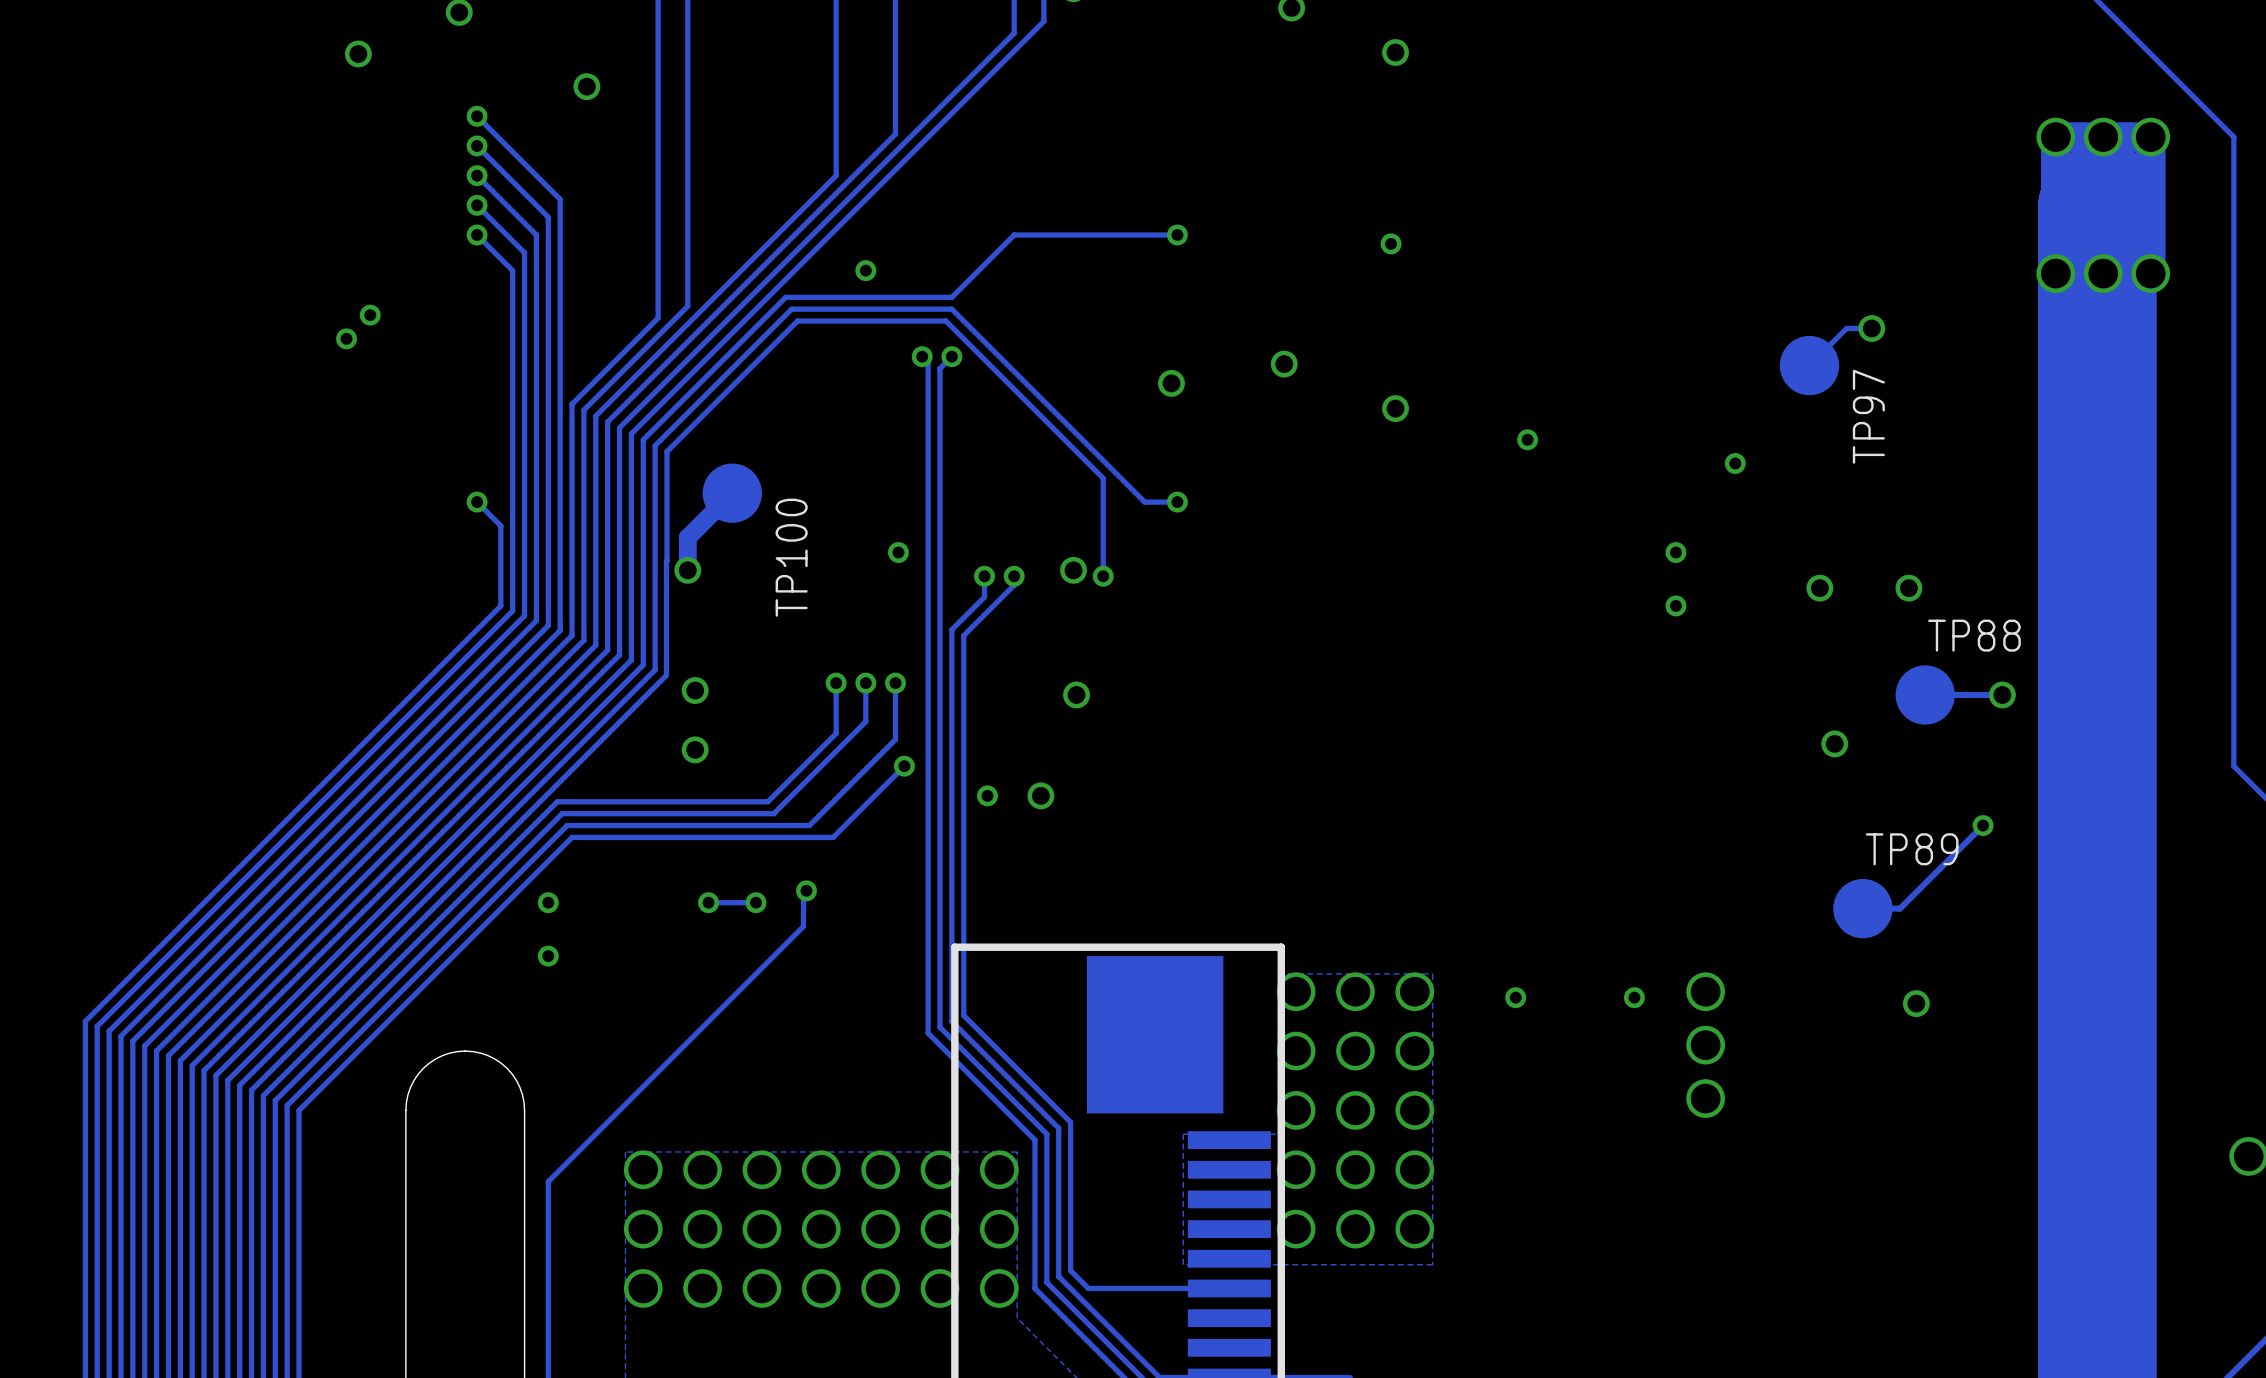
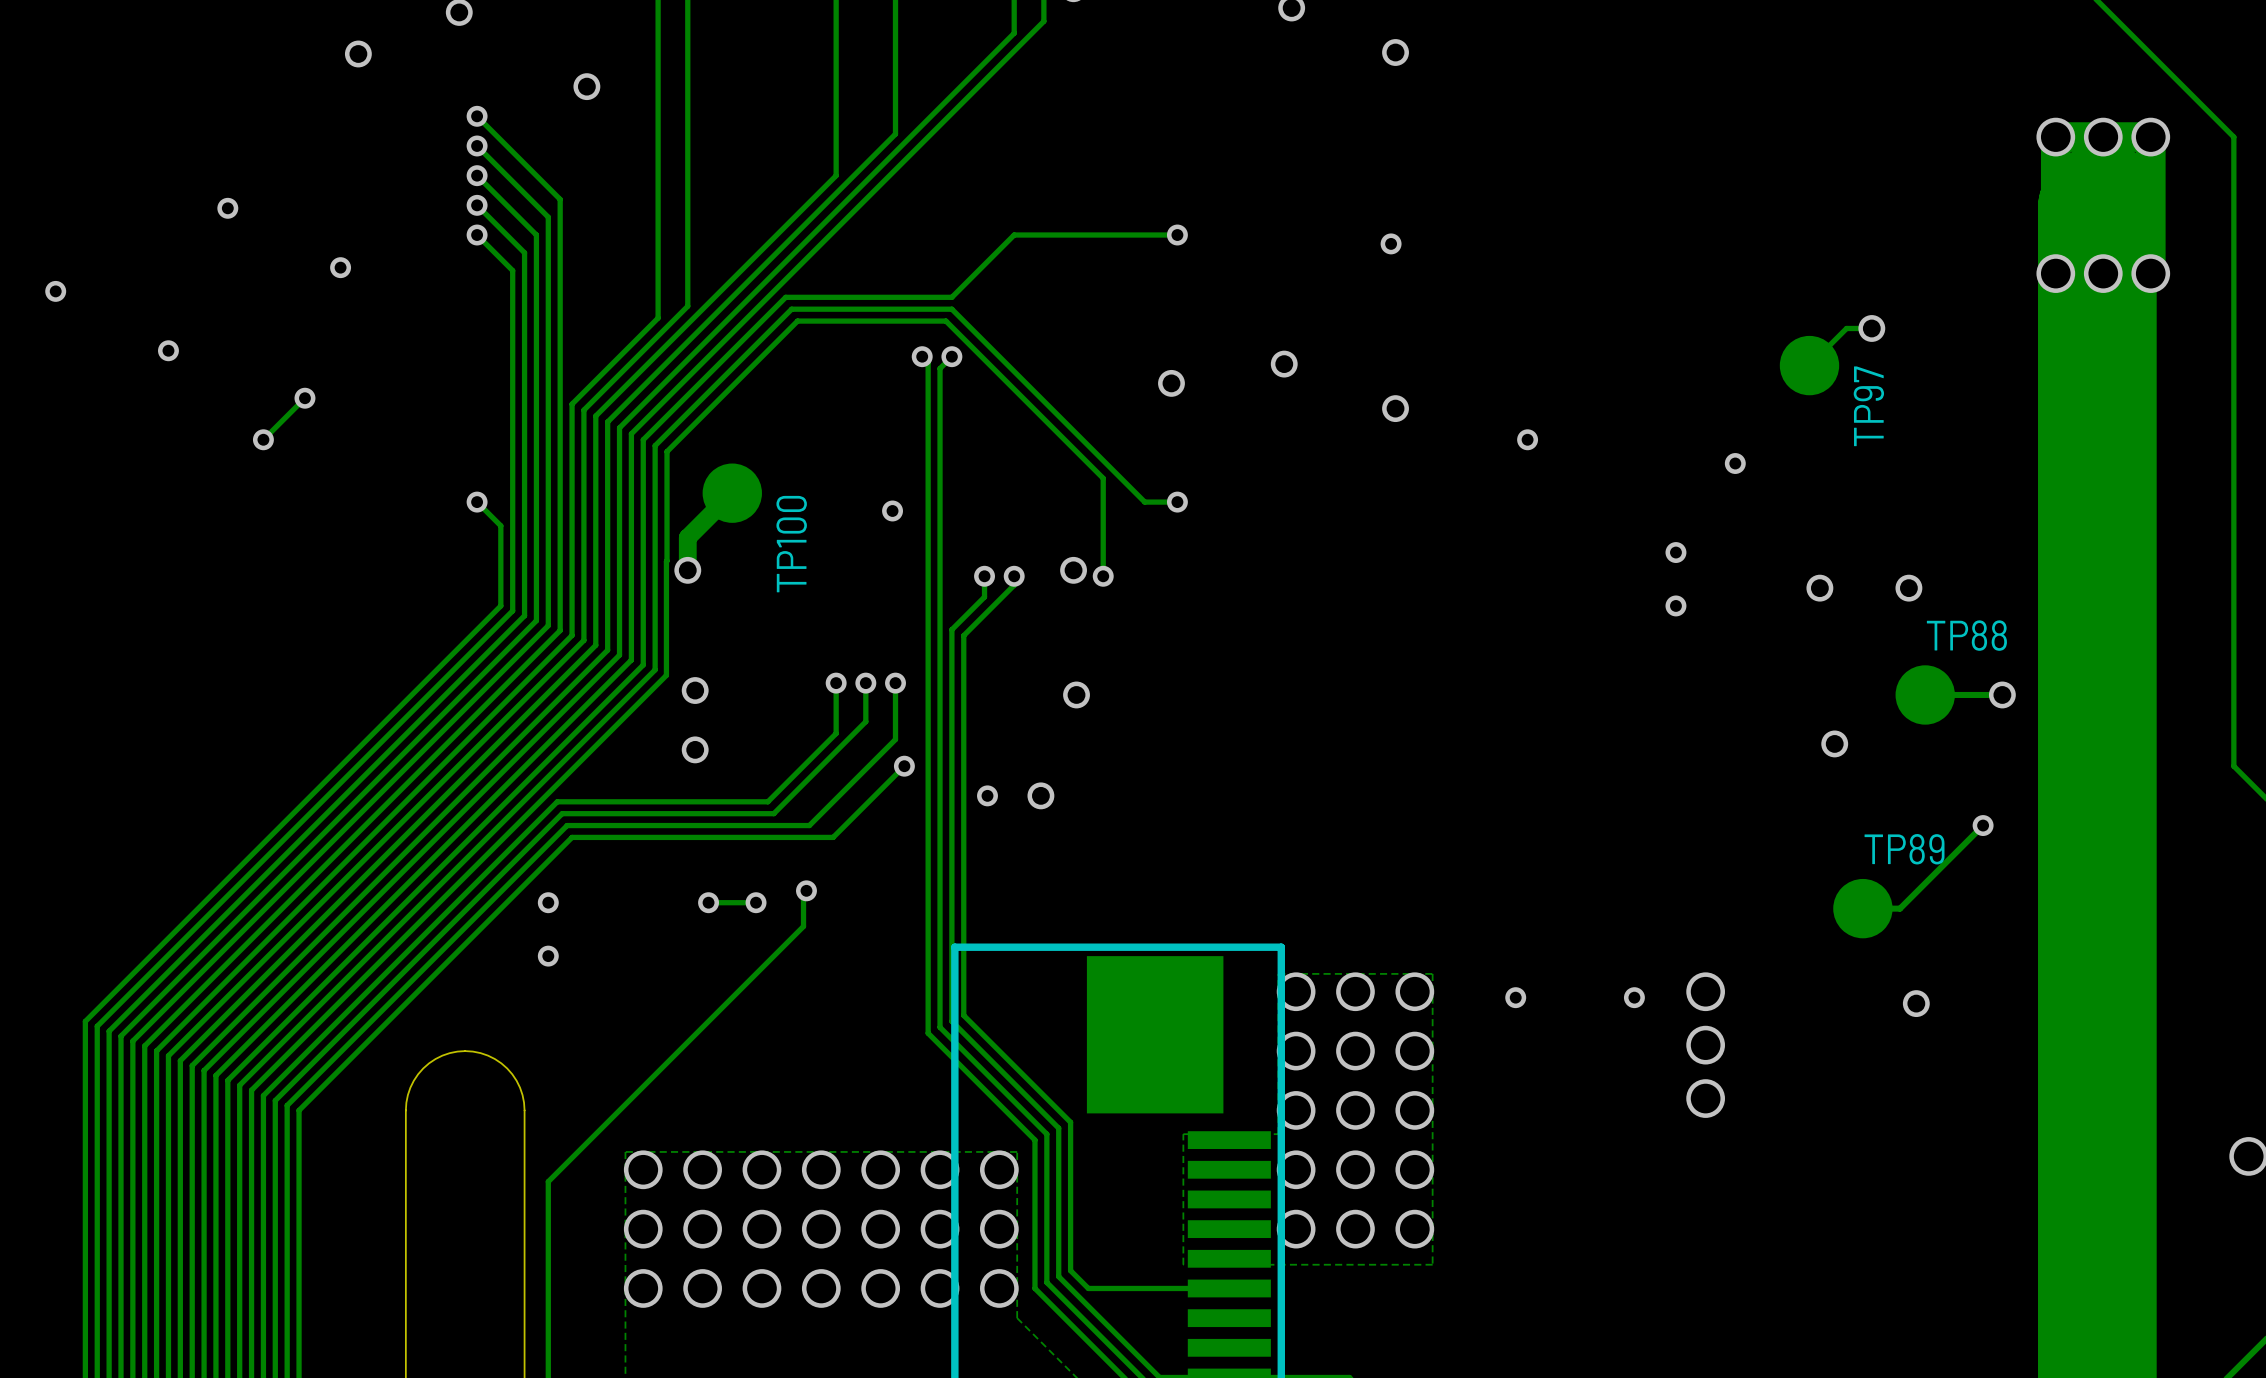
via: none -> (227, 208)
via: none -> (340, 267)
via: (865, 270) -> none
via: none -> (55, 291)
via: (370, 315) -> none
via: (346, 338) -> none
via: none -> (168, 350)
track: none -> (304, 398) (263, 439)
via: none -> (304, 398)
via: none -> (263, 439)
via position: (898, 552) -> (892, 510)

